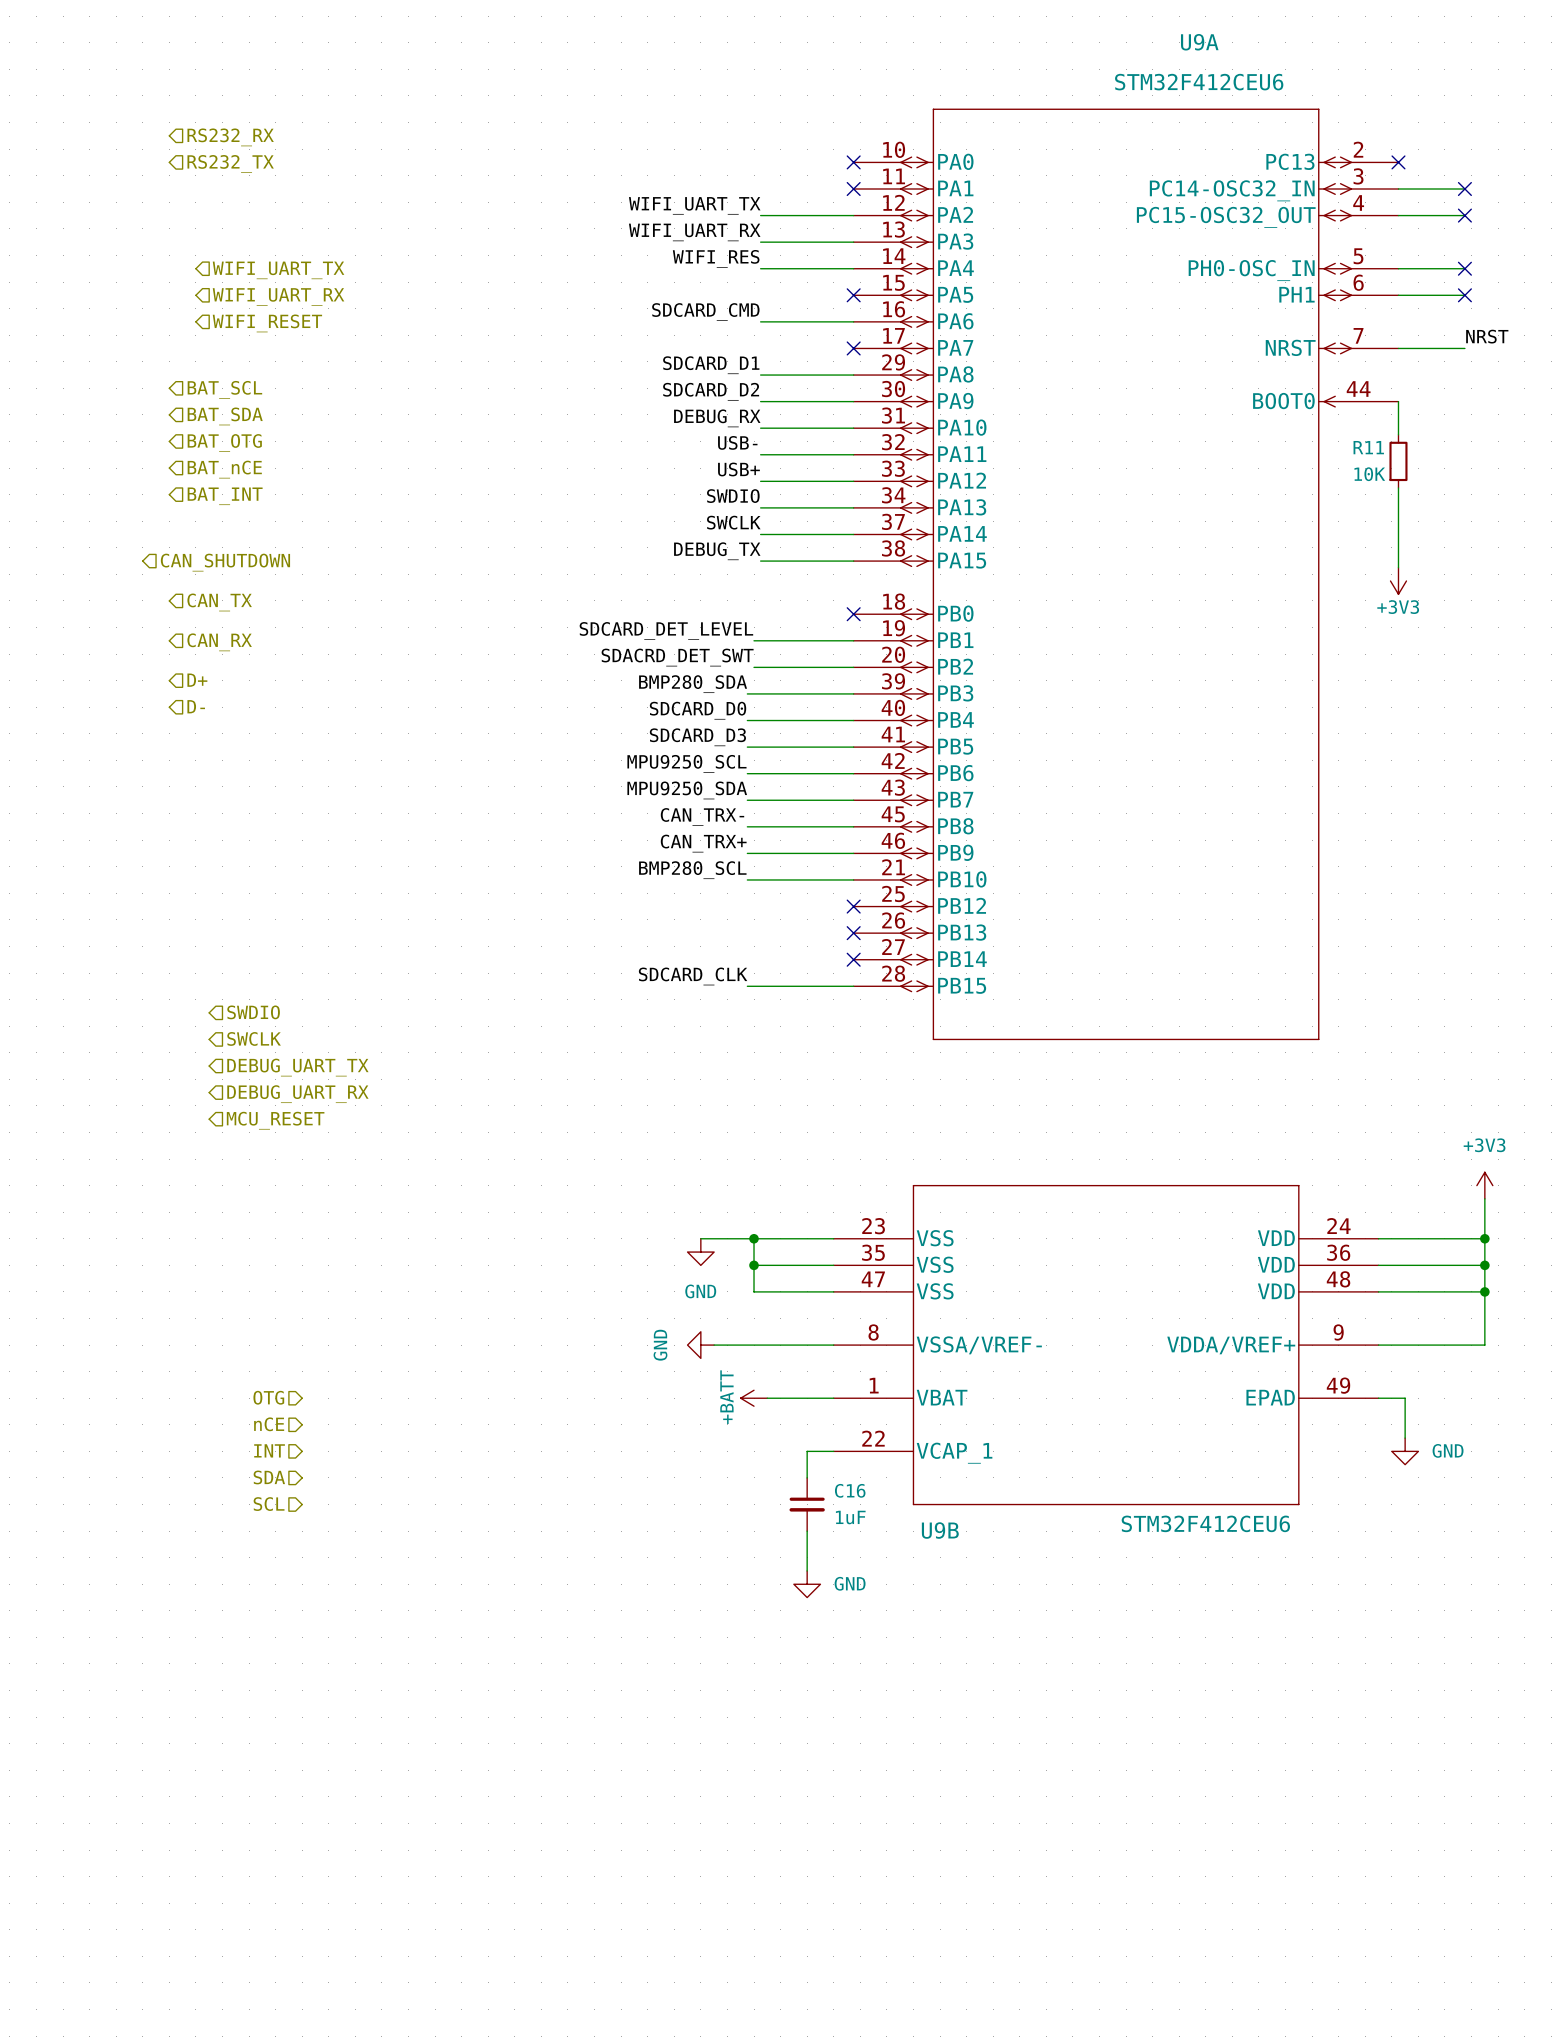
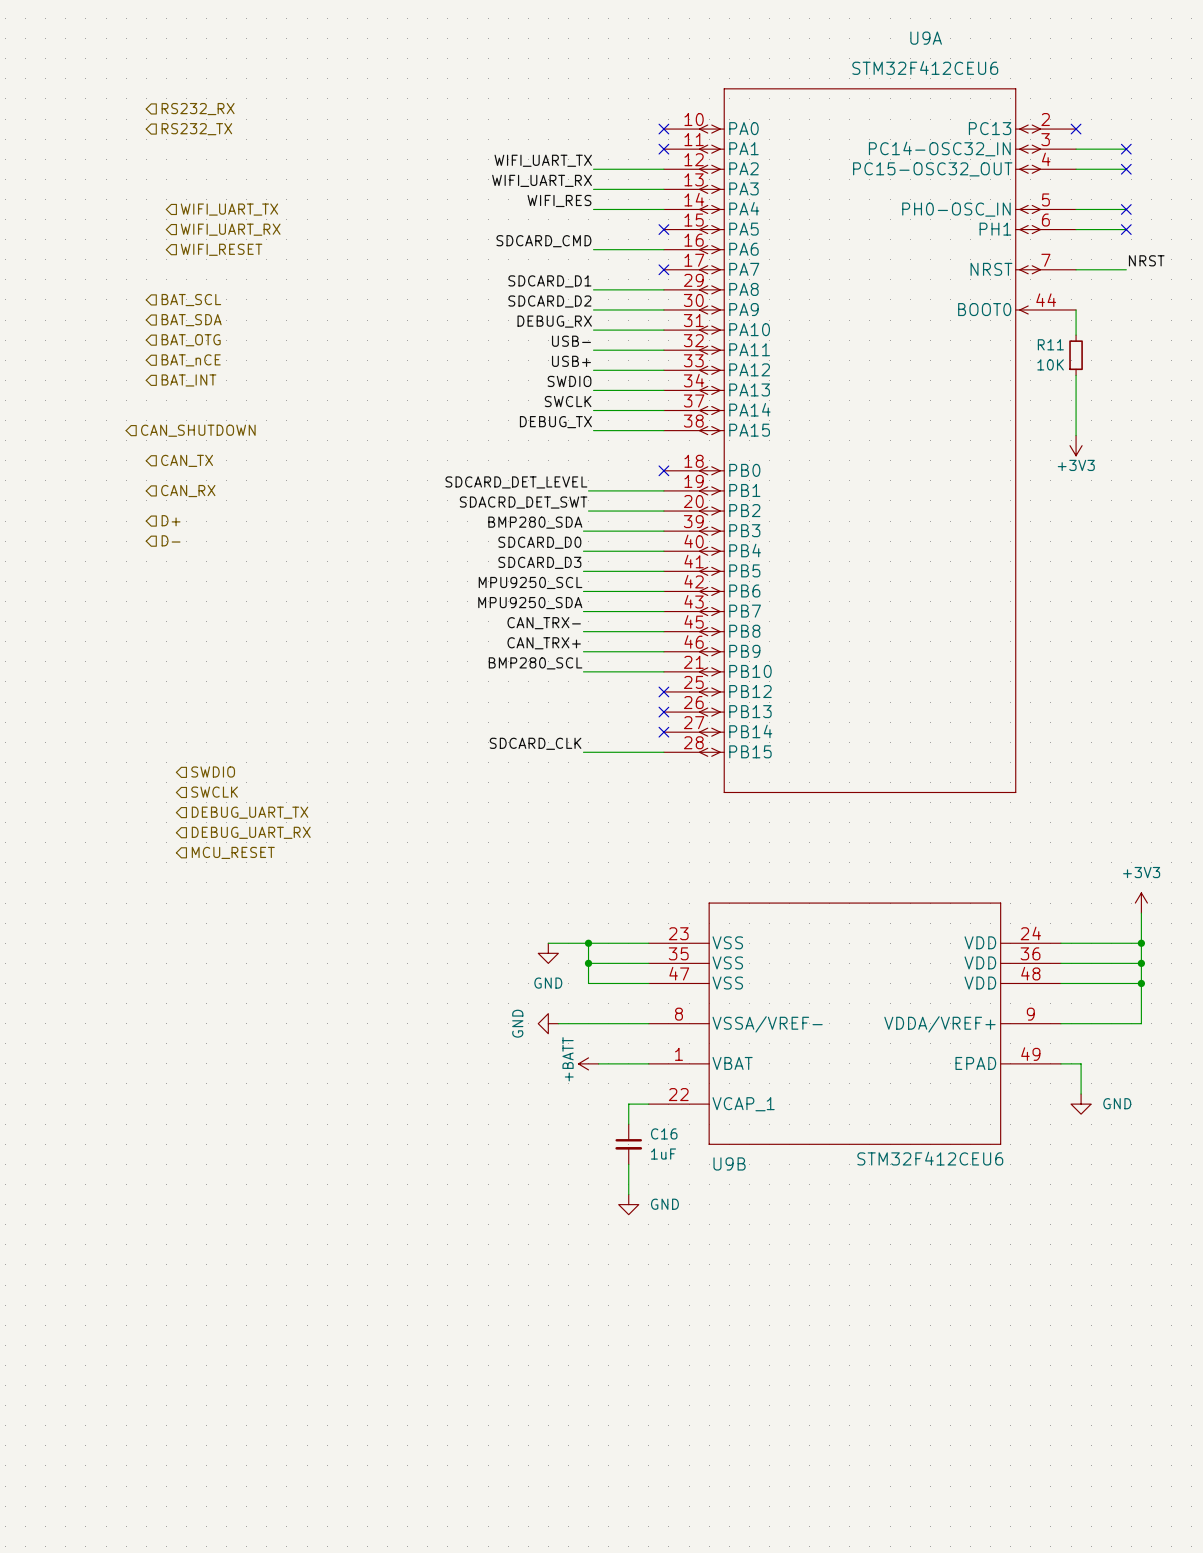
hierarchical label: OTG (268, 1397) -> none
hierarchical label: nCE (269, 1424) -> none
hierarchical label: INT (269, 1450) -> none
hierarchical label: SDA (269, 1477) -> none
hierarchical label: SCL (269, 1504) -> none

